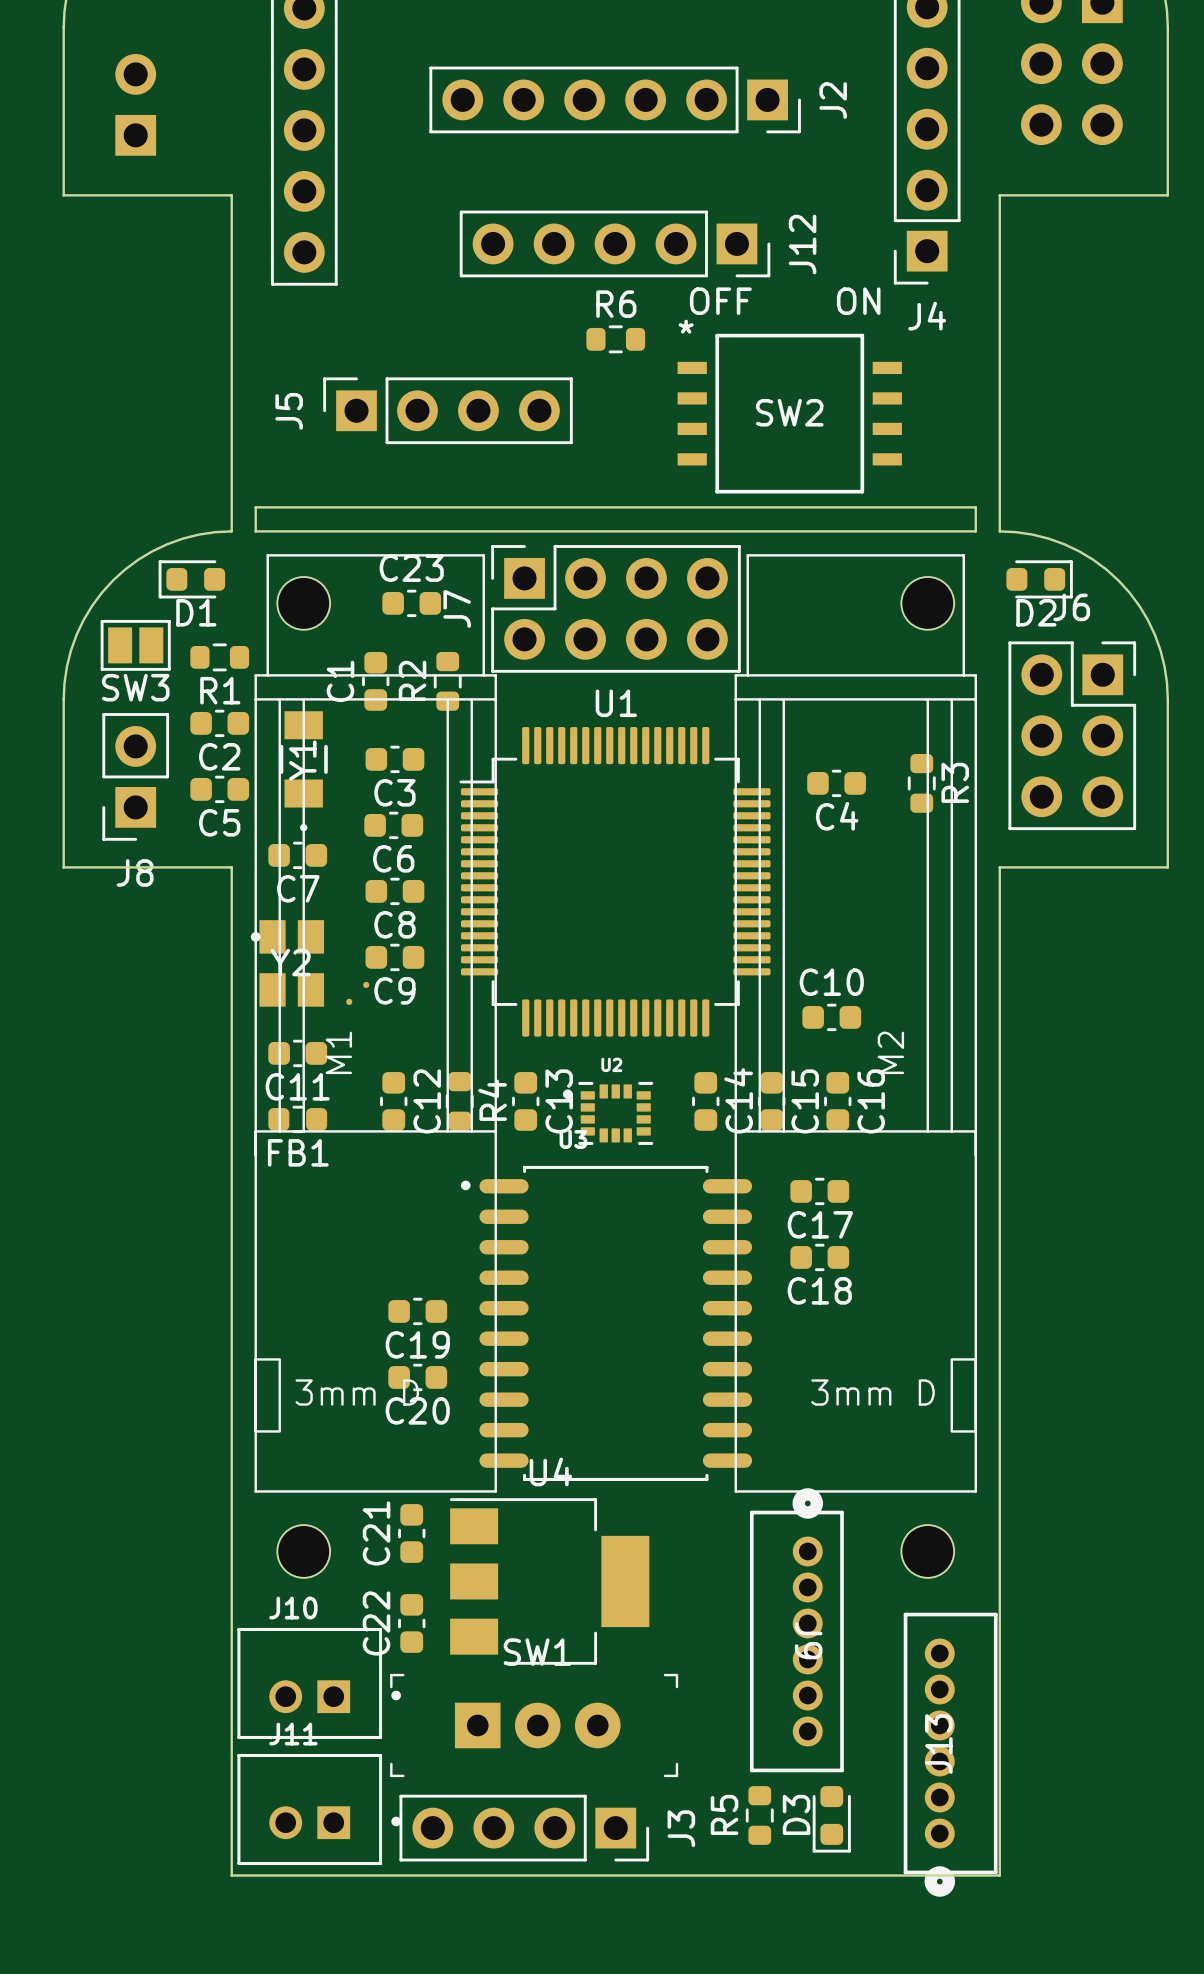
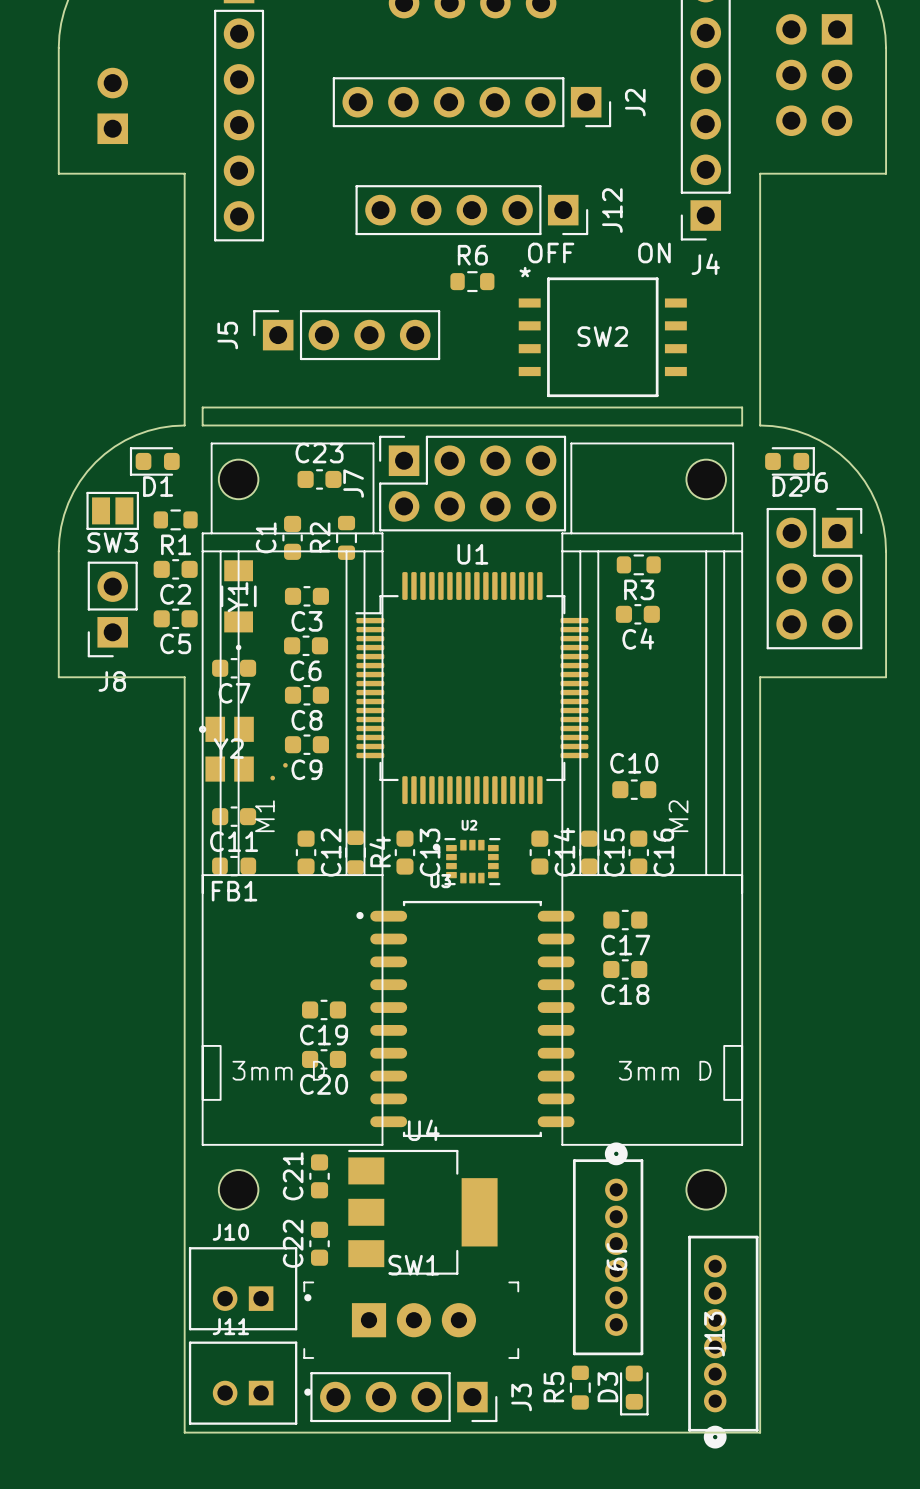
R3 rotation: 0° (921, 783) -> 90° clockwise (638, 564)
R3 position: (921, 783) -> (638, 564)

